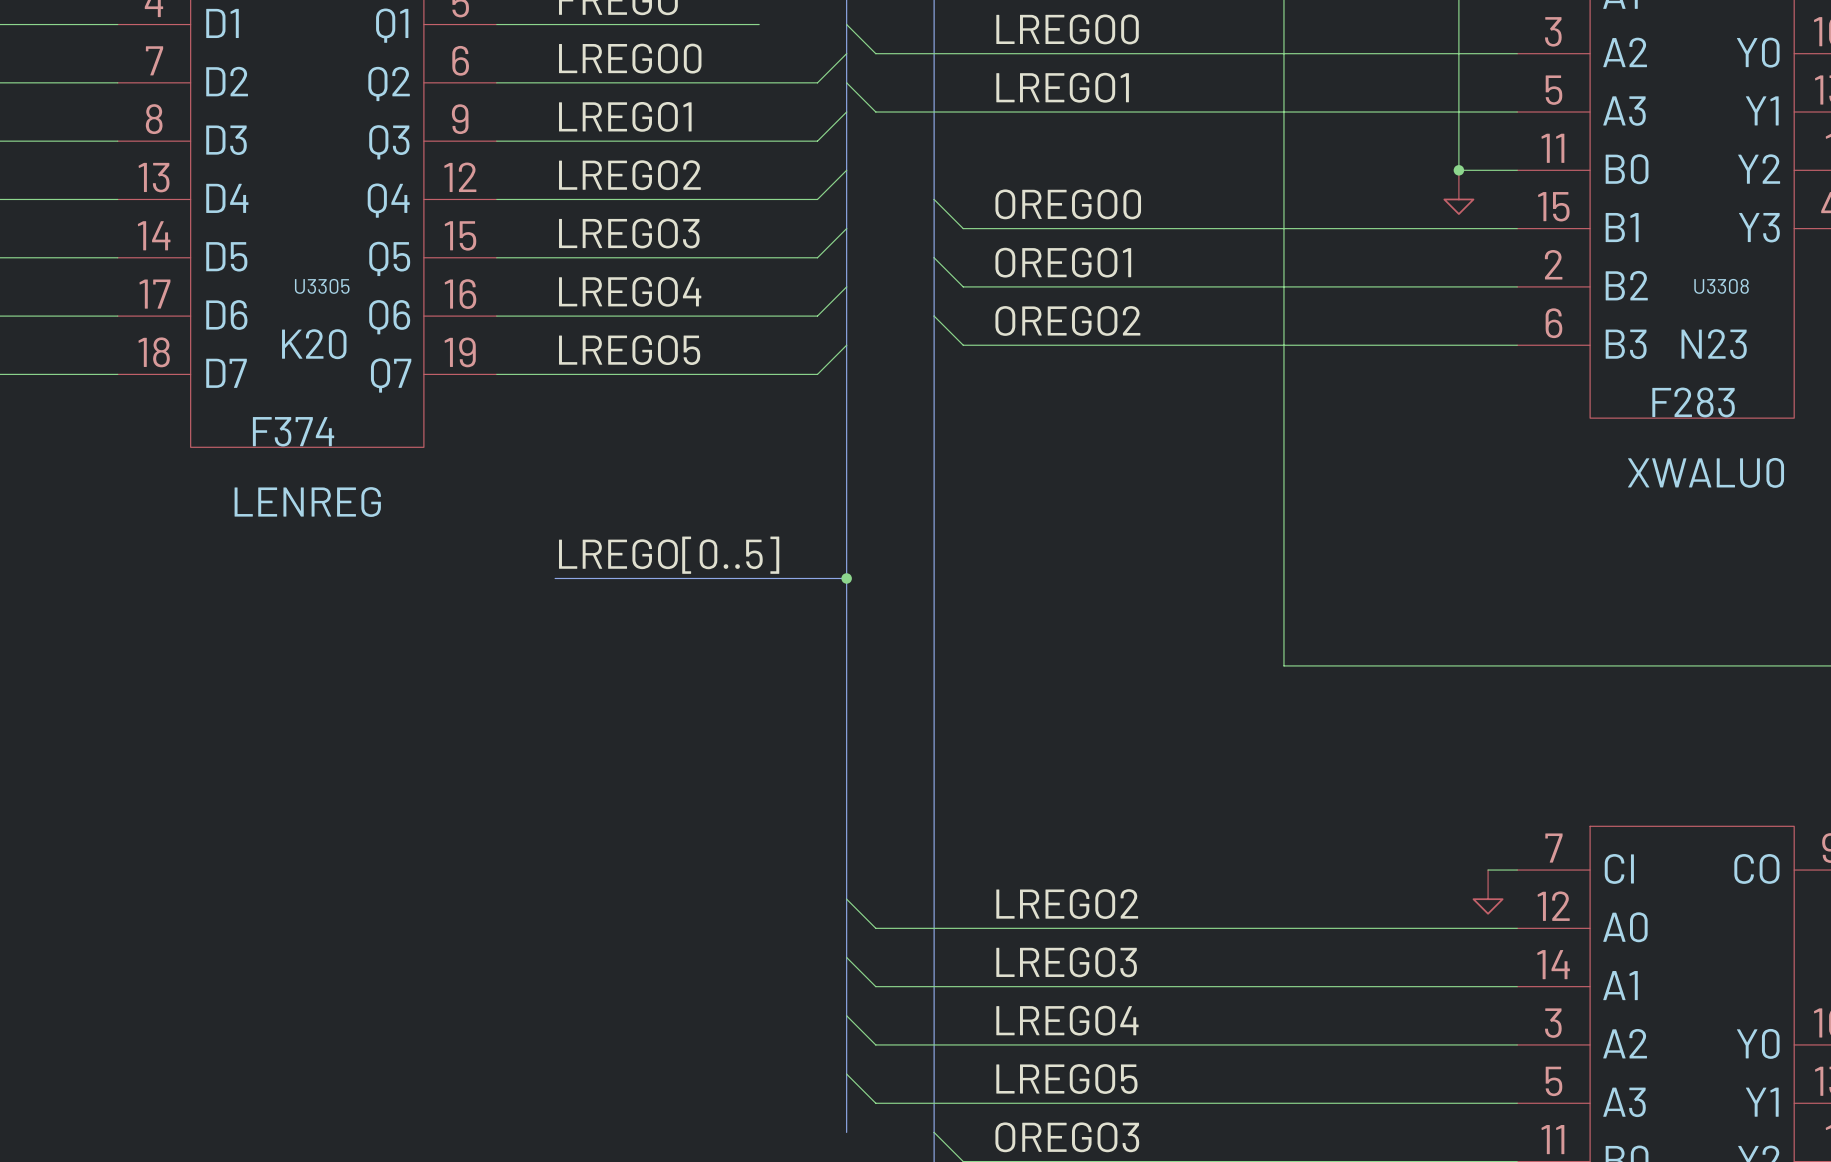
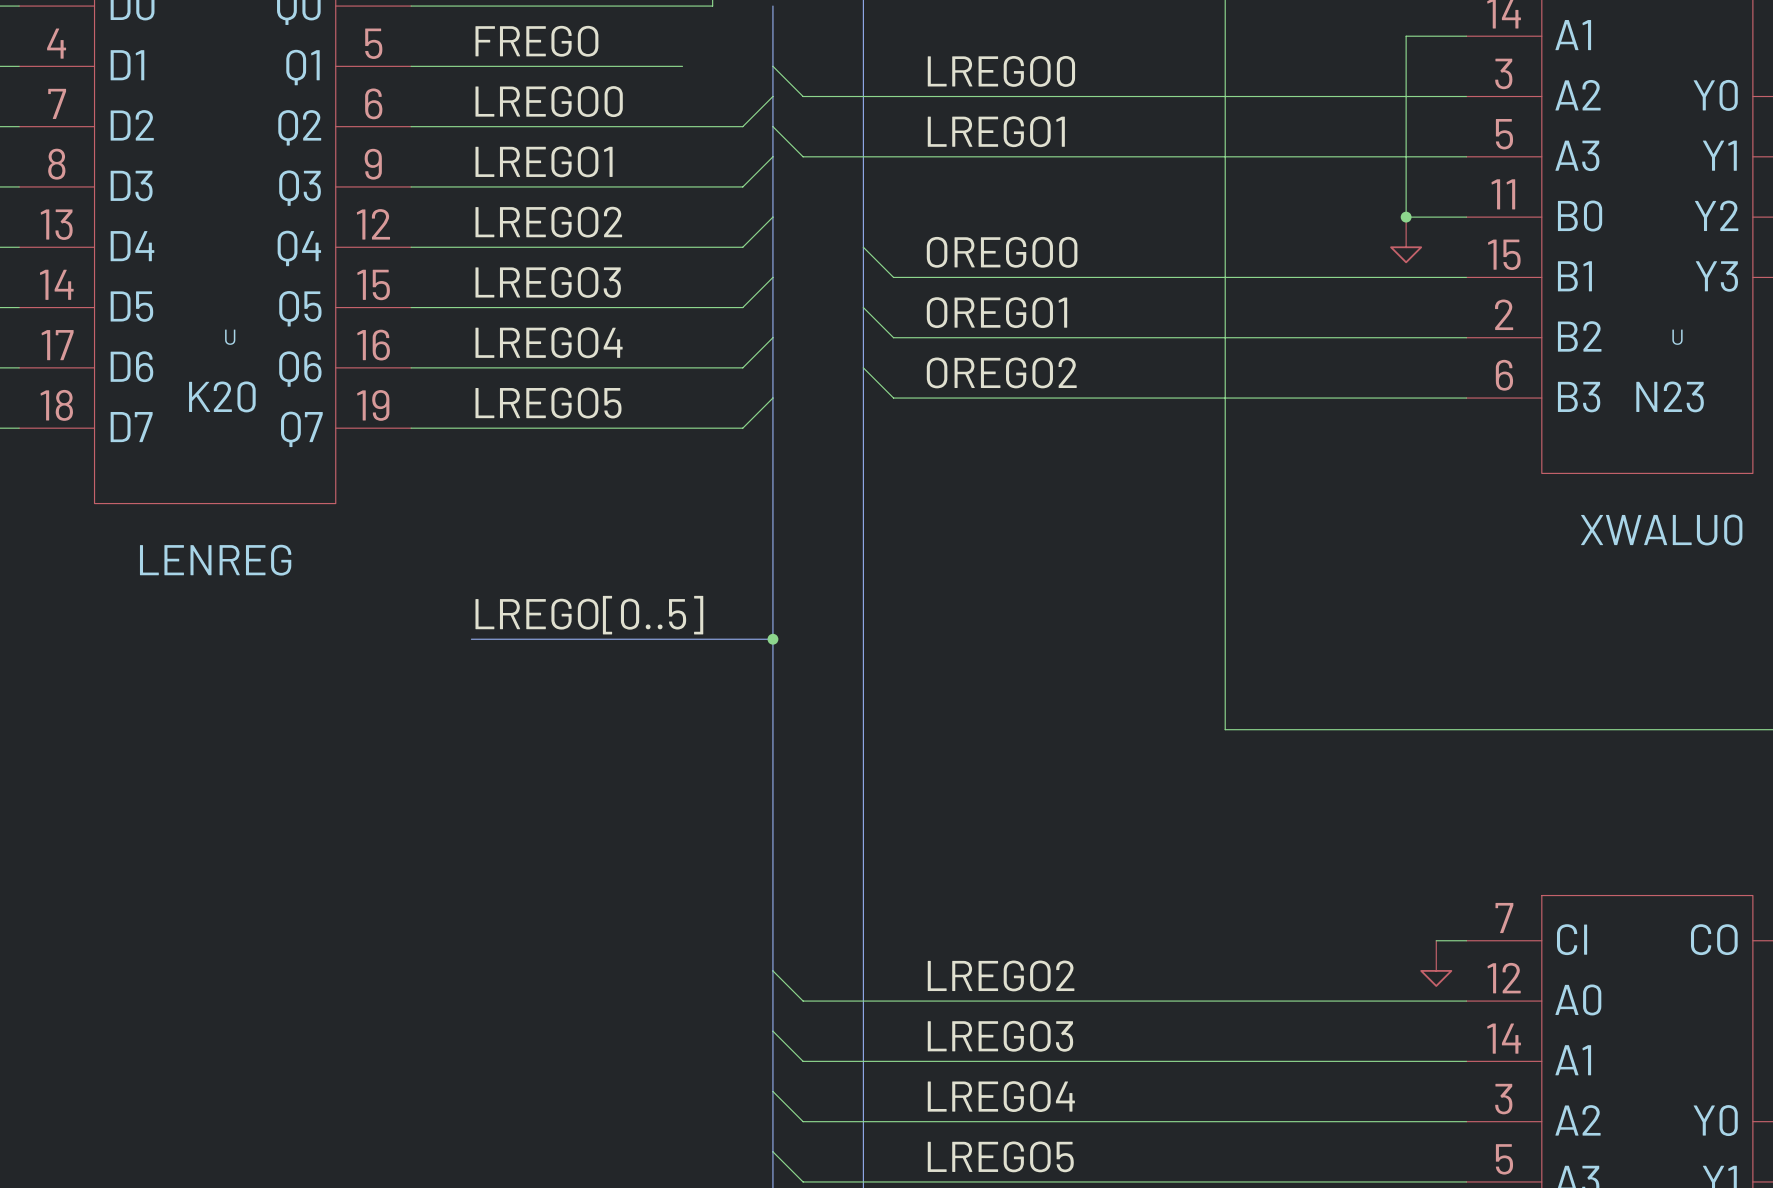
U3305 name: U3305 (322, 286) -> U (230, 337)
U3308 name: U3308 (1721, 286) -> U (1677, 337)
U3308 value: F283 (1693, 402) -> none
U3305 value: F374 (293, 431) -> none

